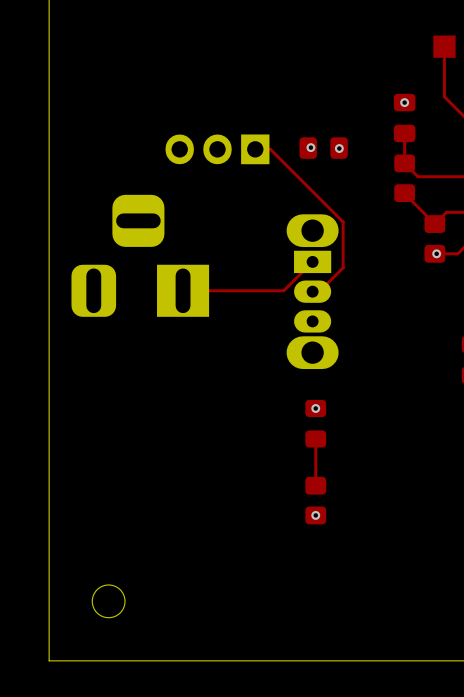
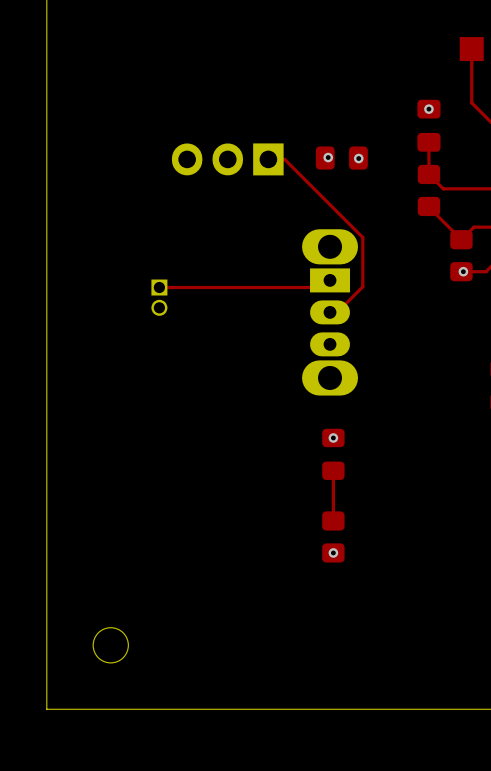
part: (140, 255) -> none
top track: (306, 268) (283, 290) (183, 290) -> (322, 287) (159, 287)
part: none -> (159, 297)

